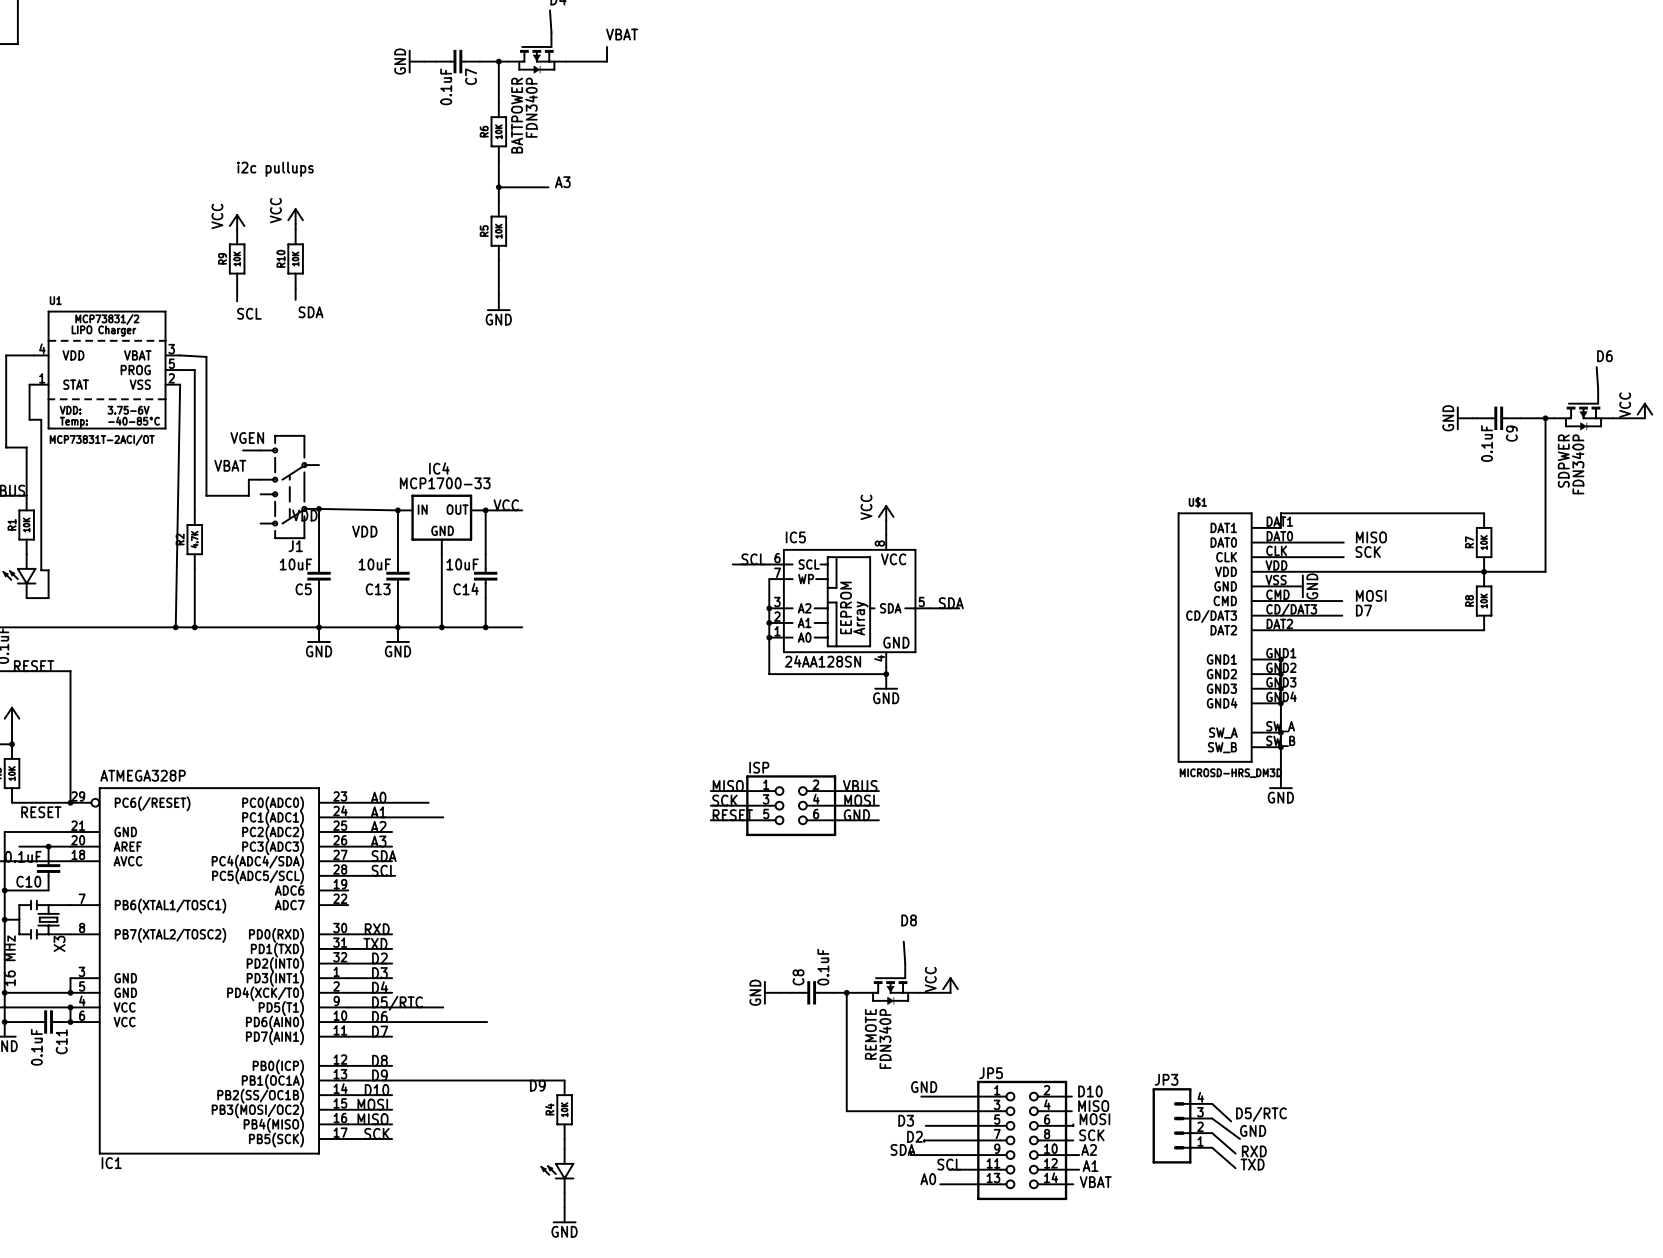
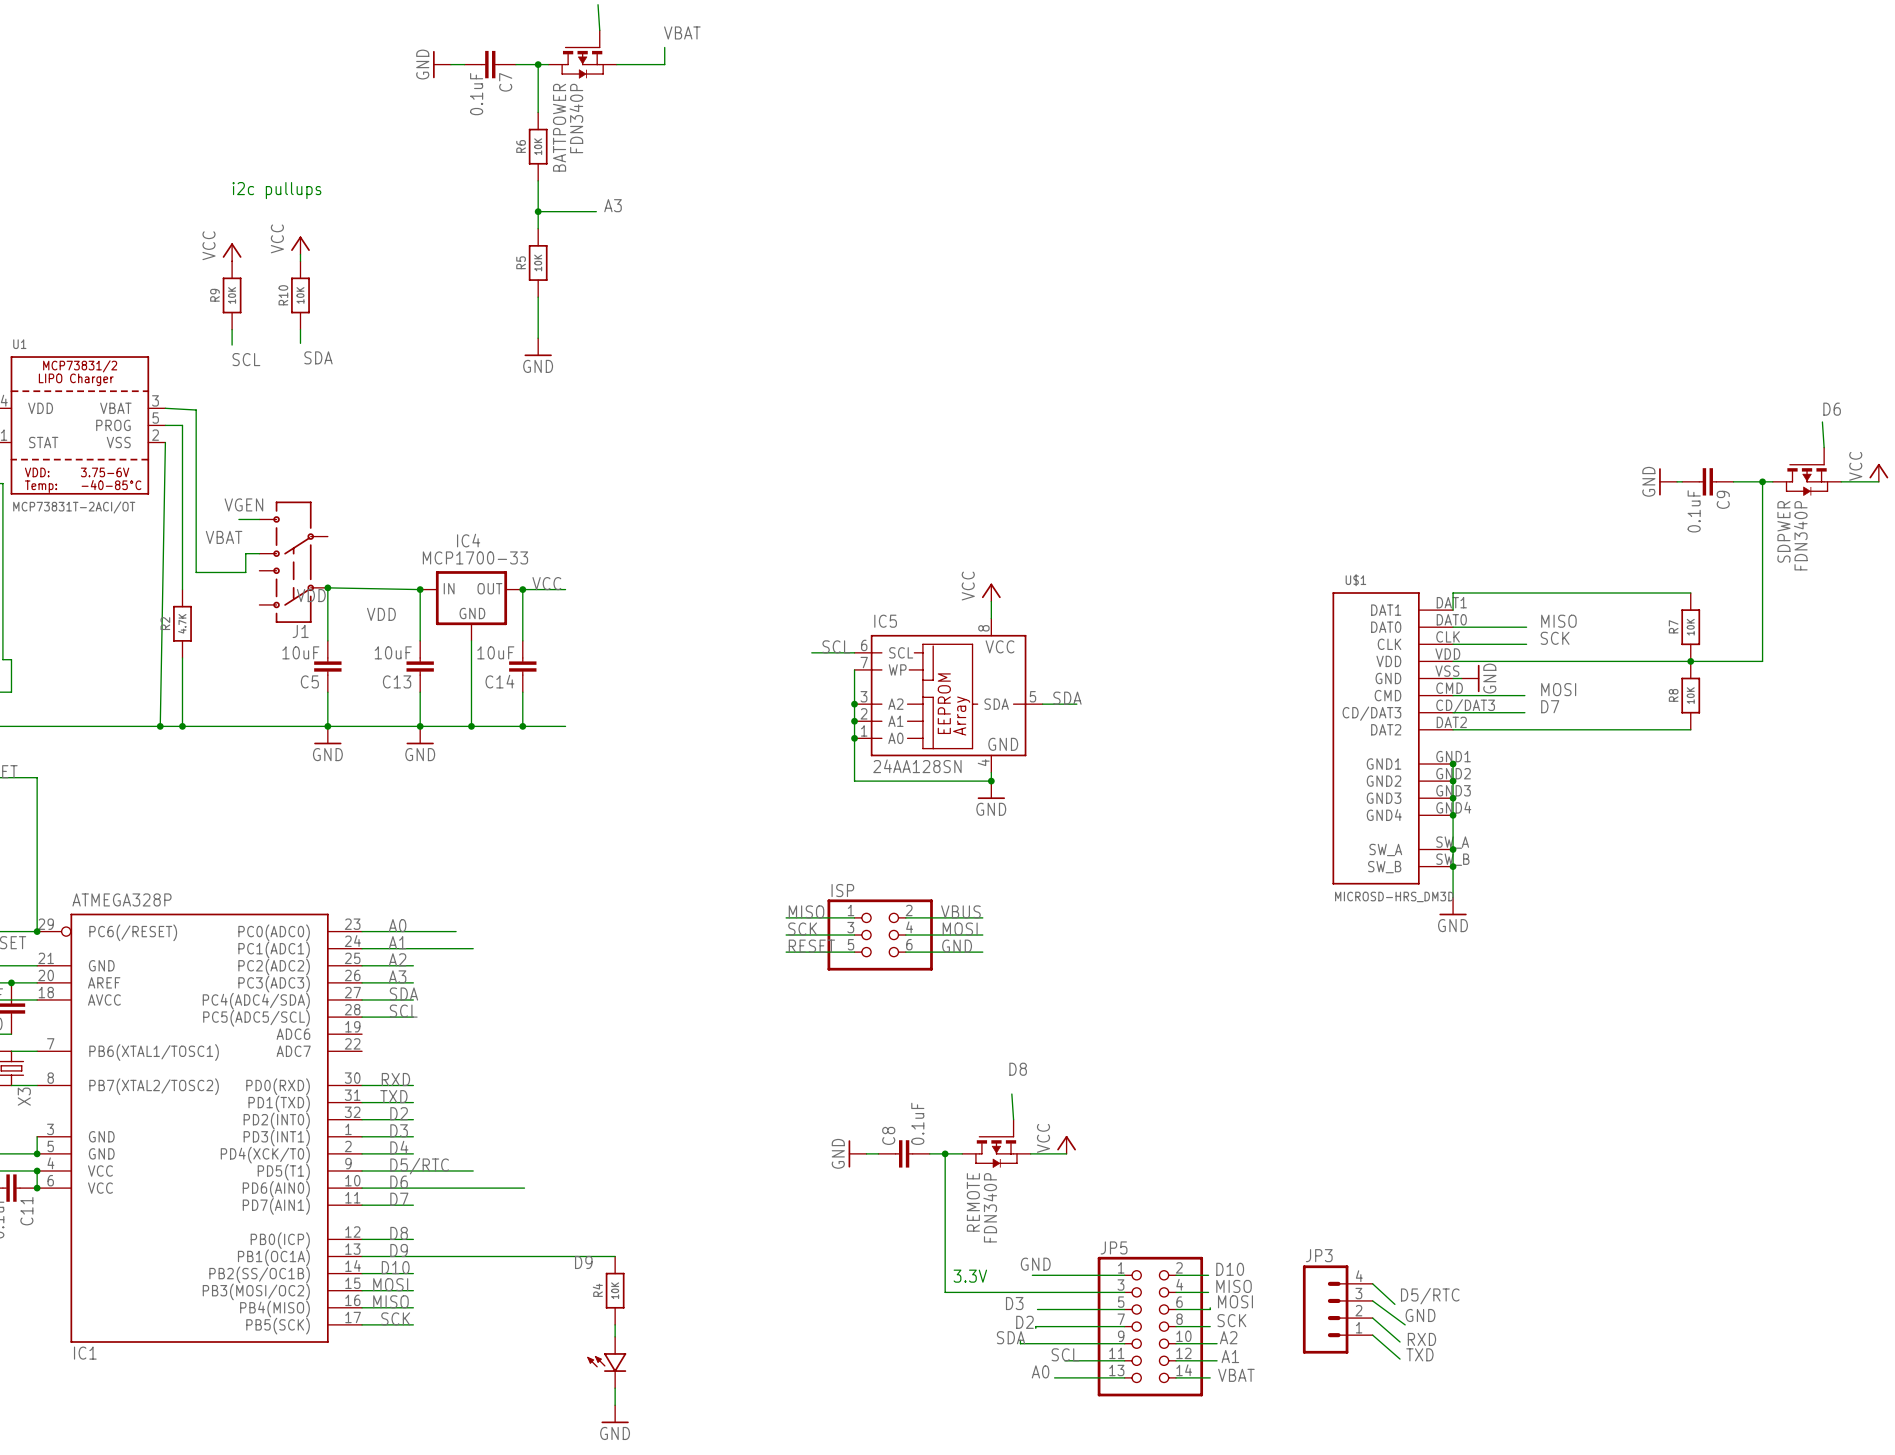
text: none -> 3.3V (970, 1276)

